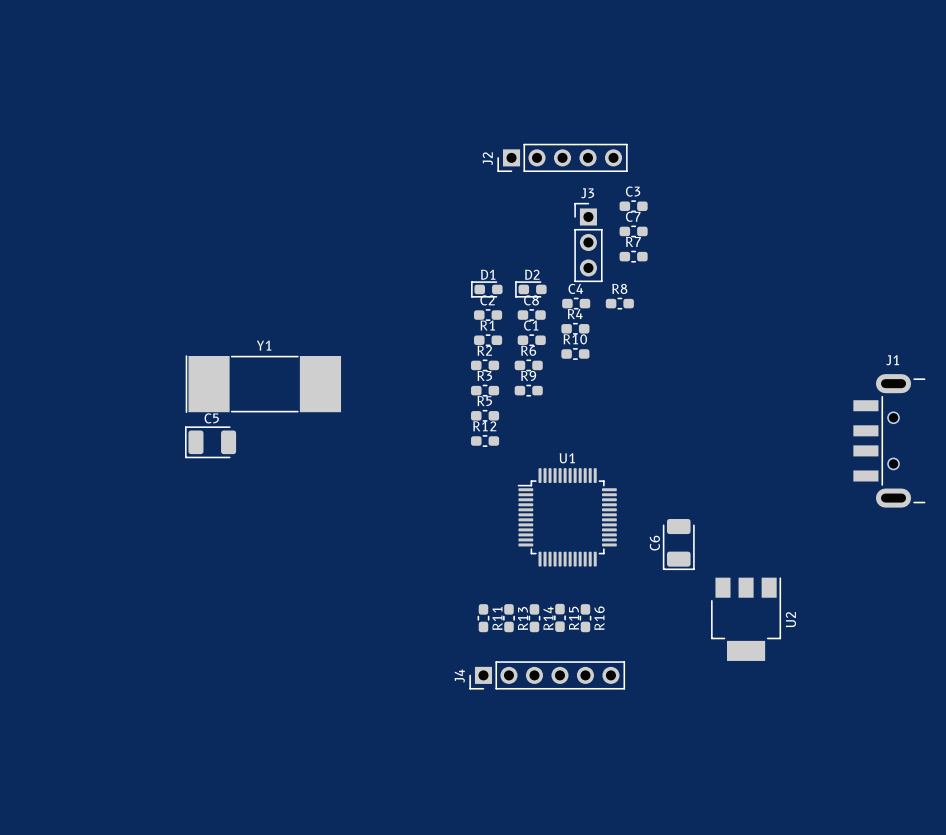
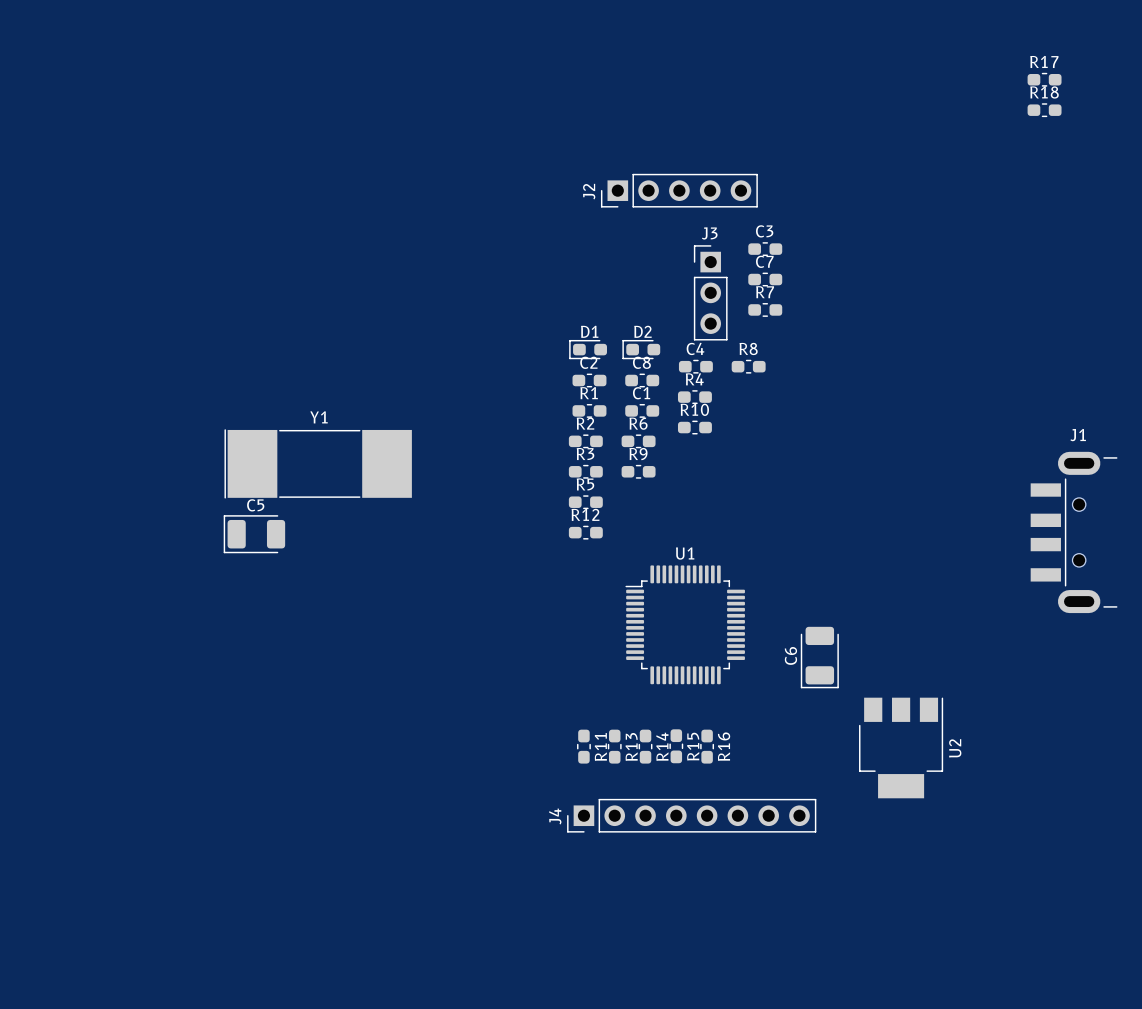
R17: none -> (1044, 79)
R18: none -> (1044, 110)
J4 footprint: [469, 661, 625, 690] -> [567, 798, 817, 833]

